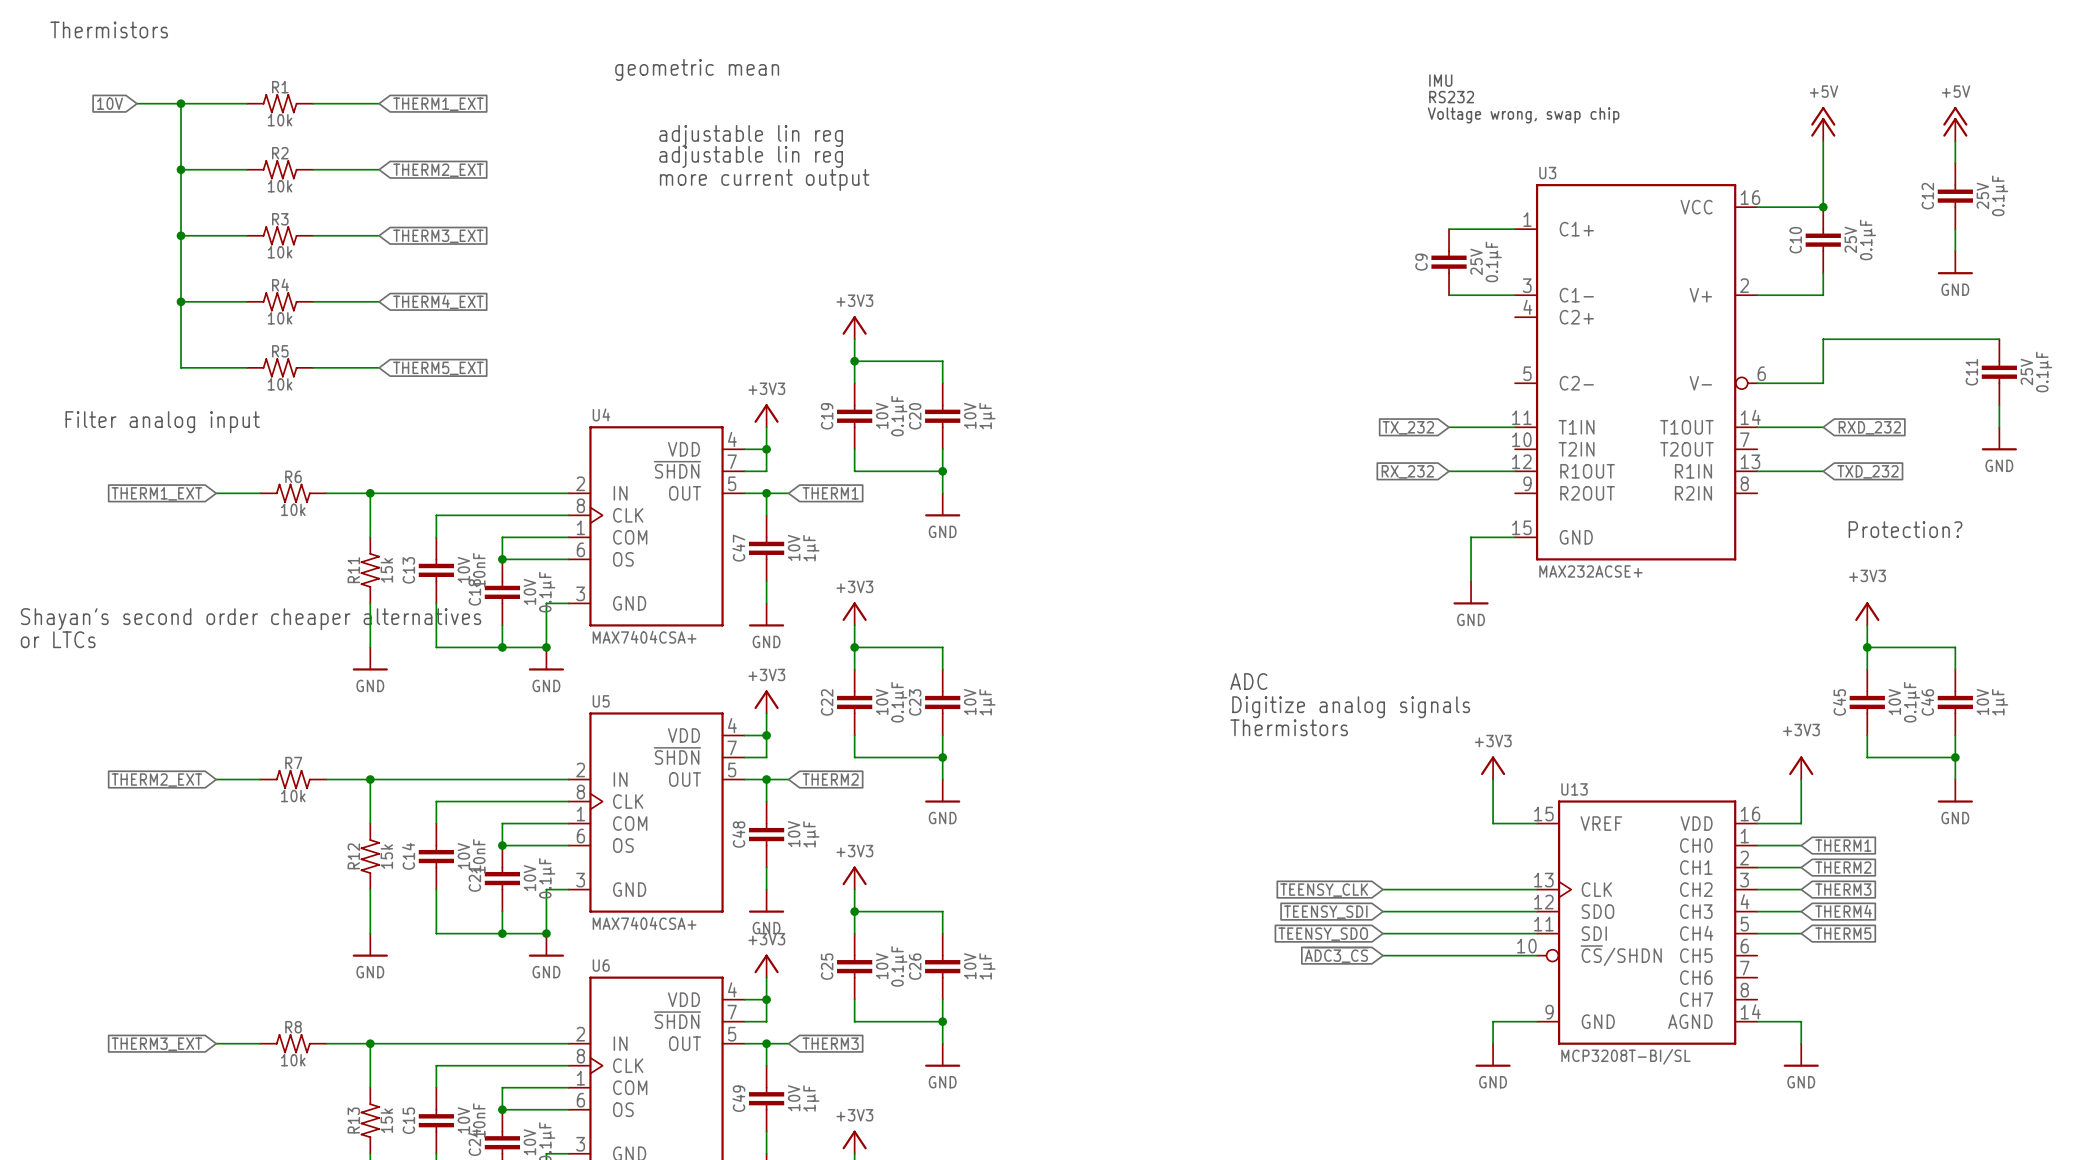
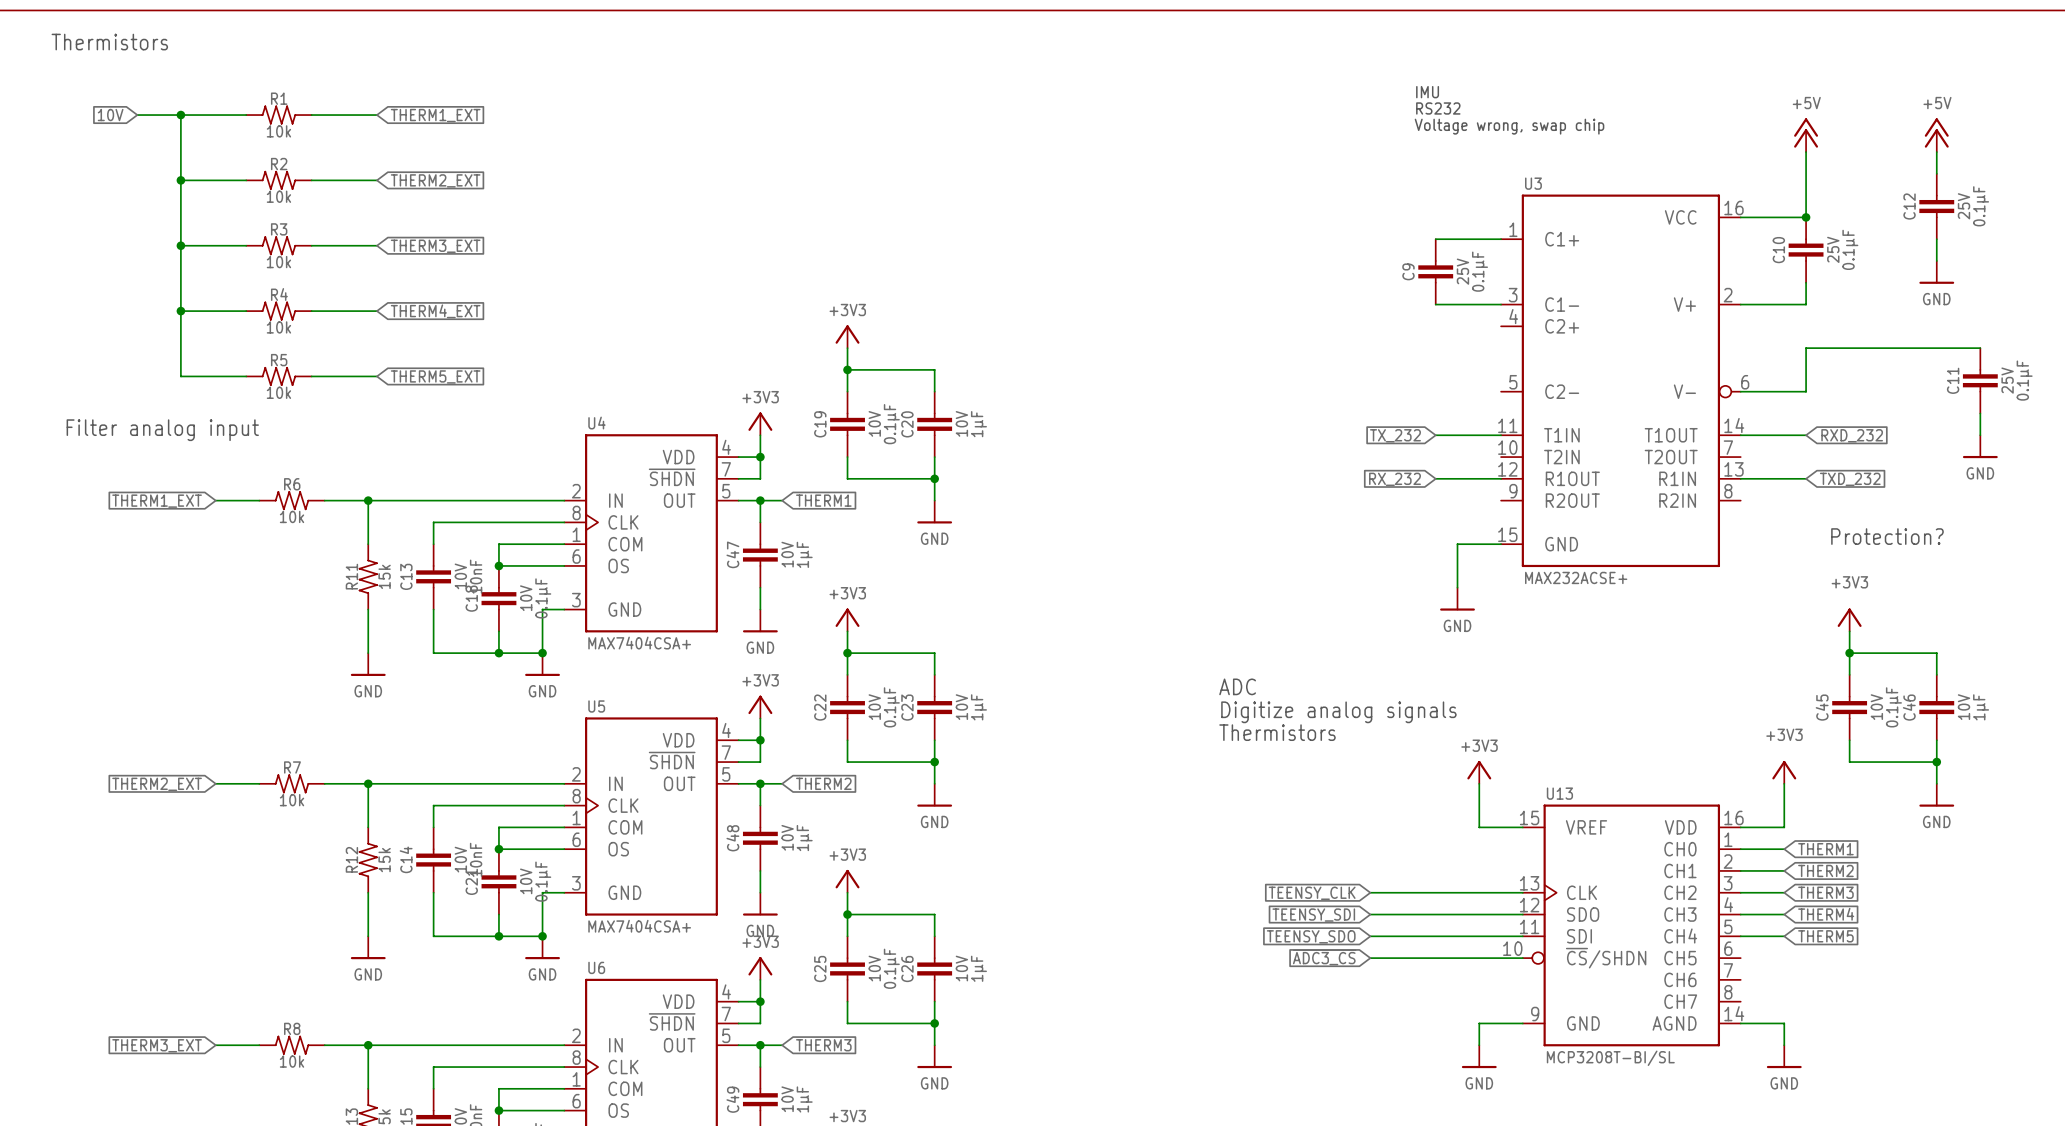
text: geometric mean (697, 69) -> none
text: adjustable lin reg (751, 135) -> none
text: adjustable lin reg (751, 156) -> none
text: more current output (764, 180) -> none
text: Shayan's second order cheaper alternatives (251, 619) -> none
text: or LTCs (58, 639) -> none

